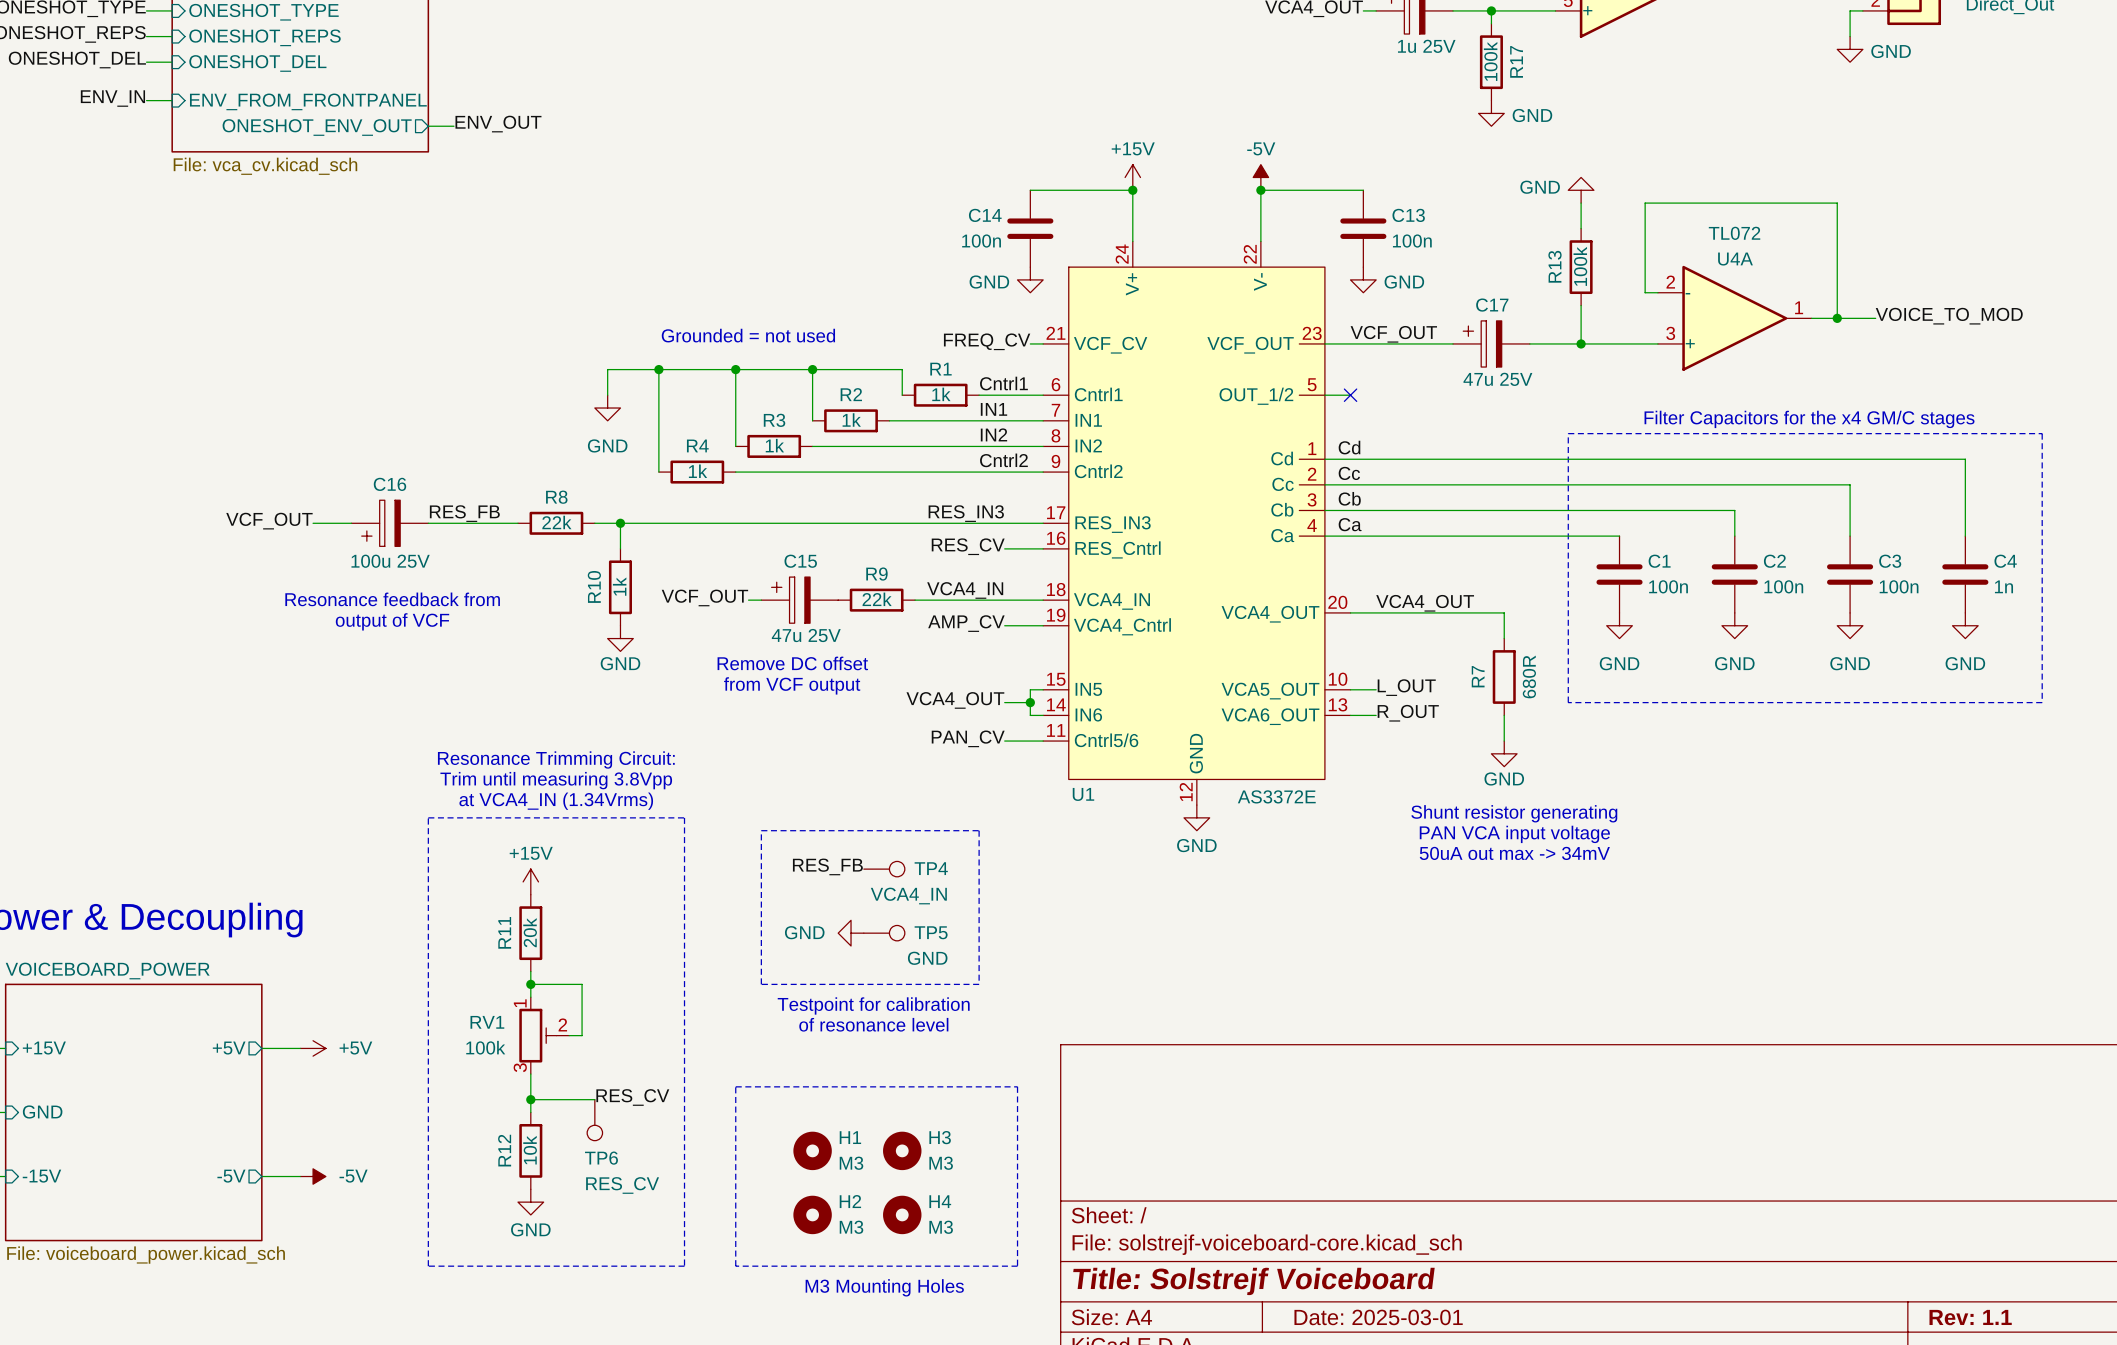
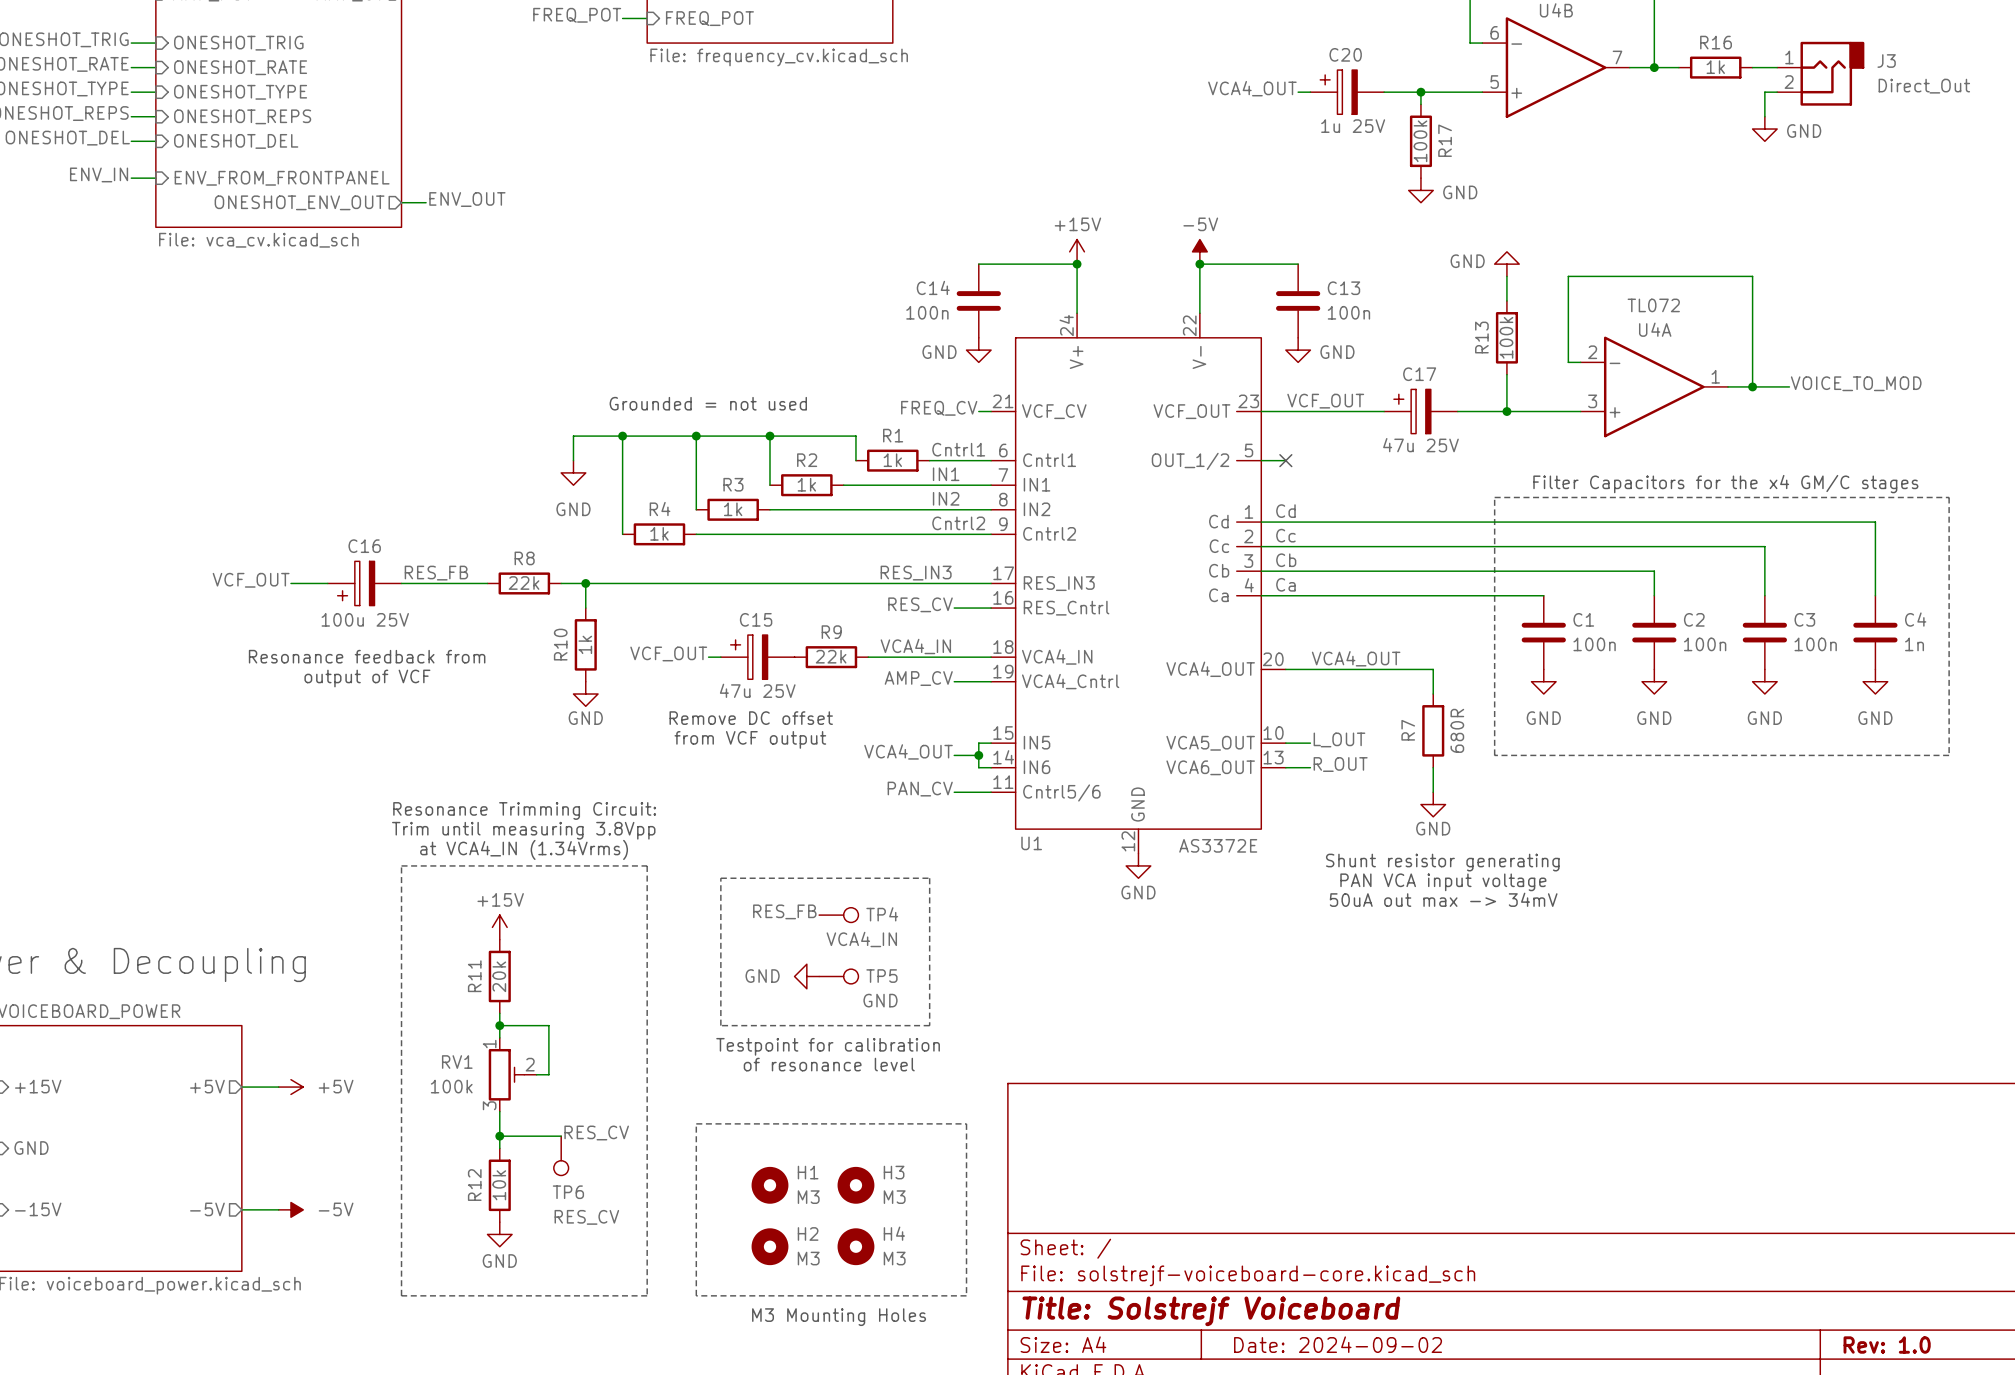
title block: Date: 2025-03-01 (1378, 1317) -> Date: 2024-09-02 (1338, 1344)
title block: Rev: 1.1 (1970, 1317) -> Rev: 1.0 (1887, 1345)

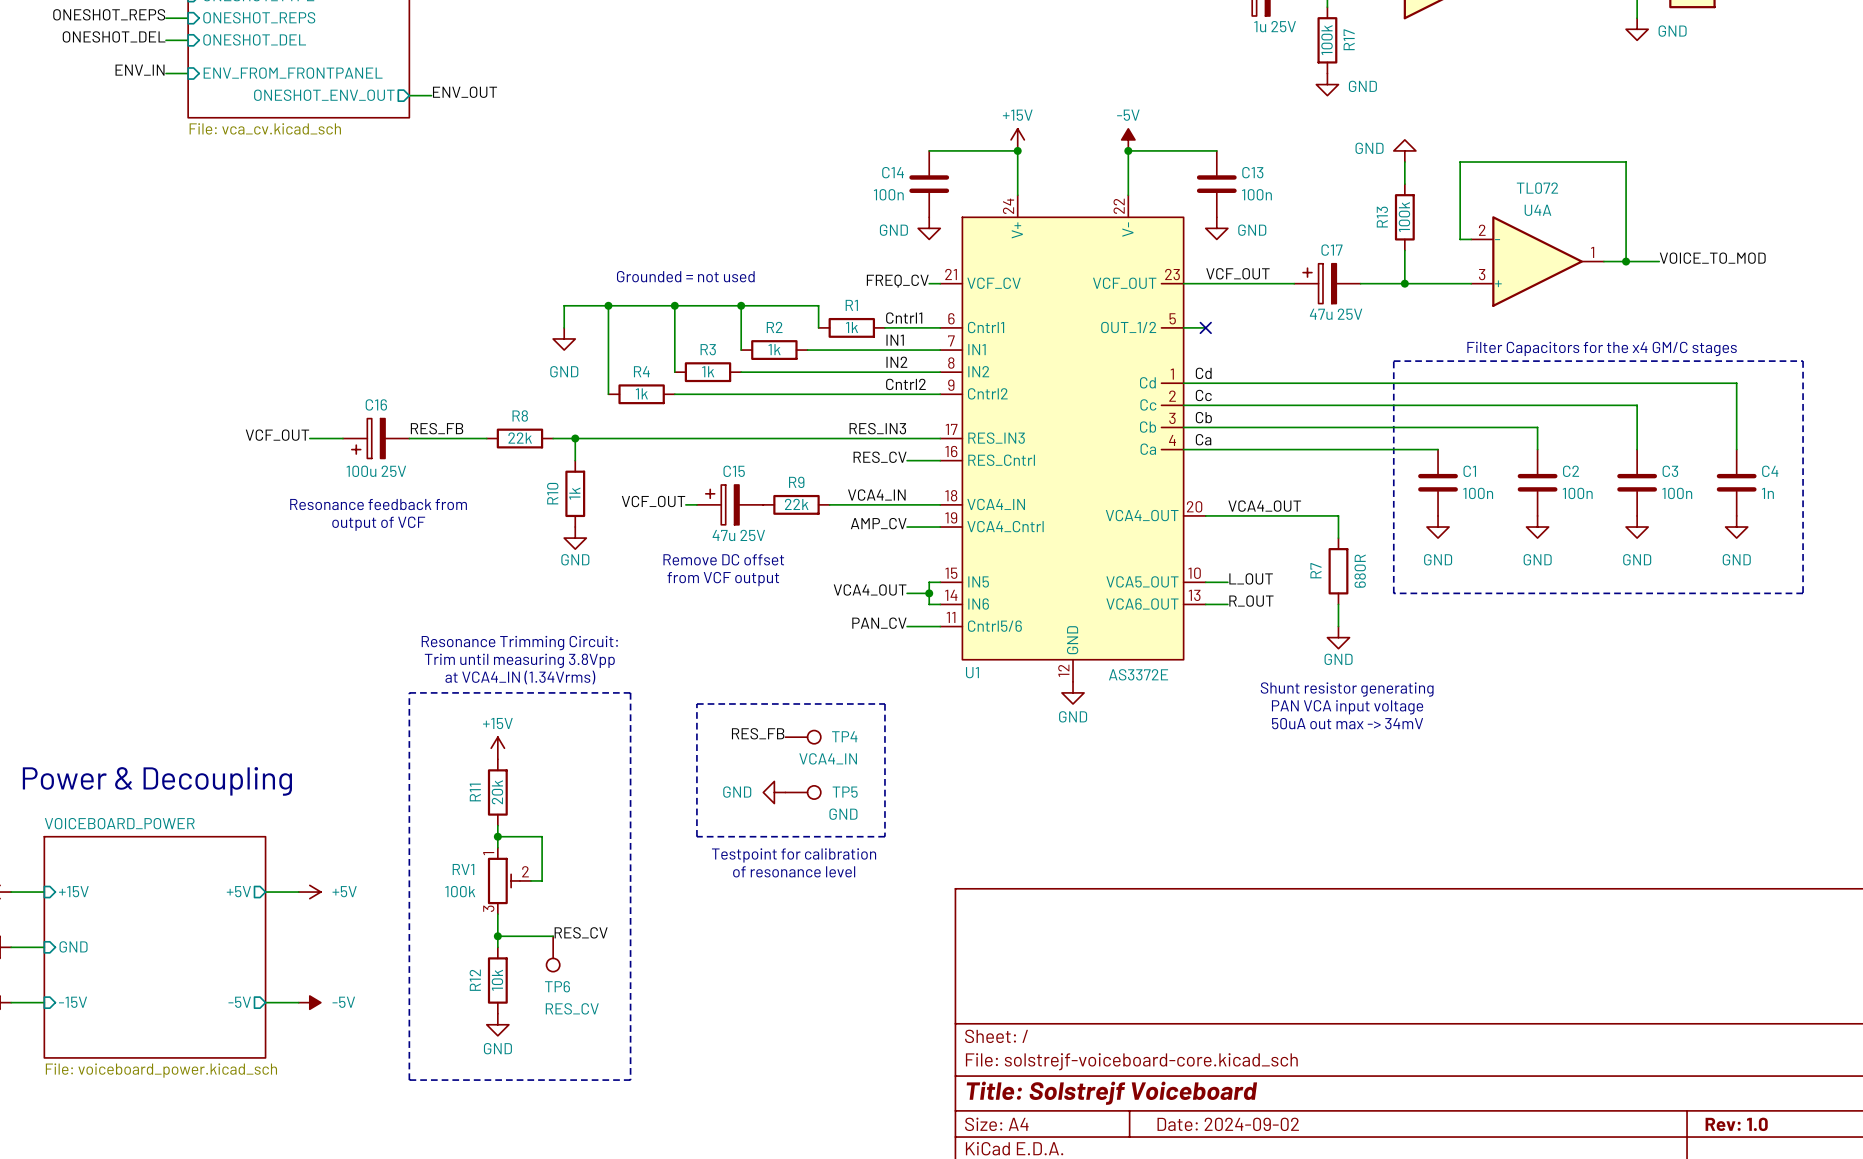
line: (696, 1123) (966, 1123) (966, 1295) (696, 1295) (696, 1123) -> none
H1: M3 (769, 1185) -> none
H3: M3 (855, 1185) -> none
H2: M3 (769, 1246) -> none
H4: M3 (855, 1246) -> none
text: M3 Mounting Holes (839, 1317) -> none

